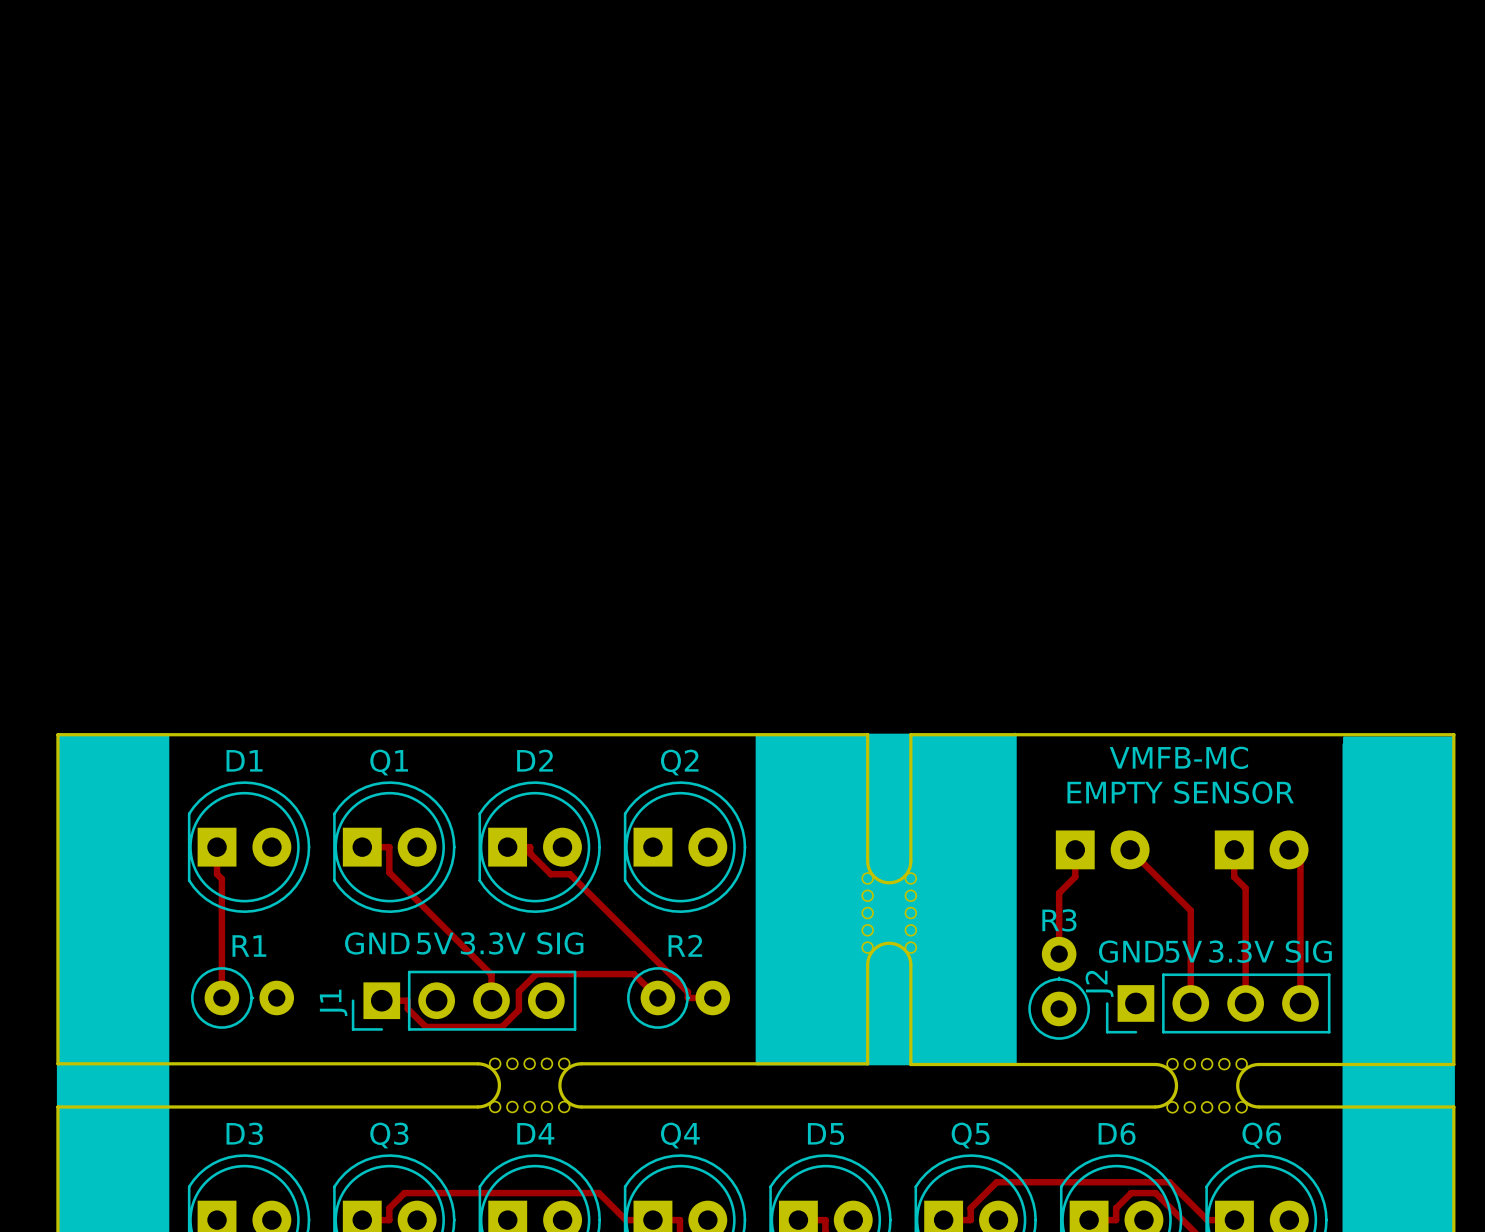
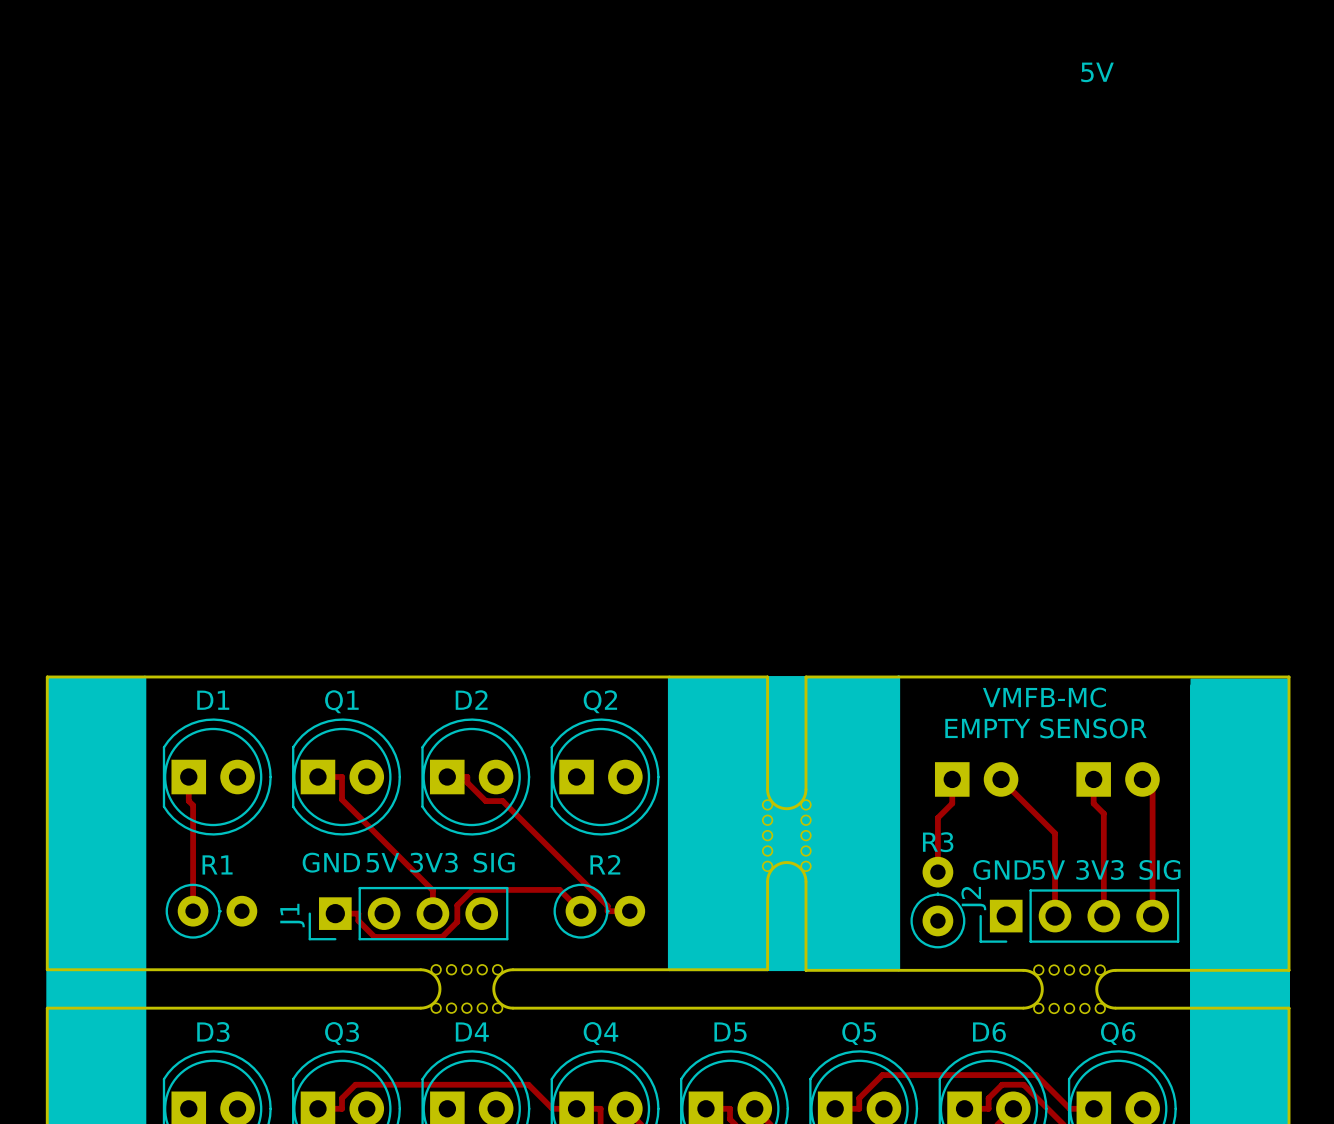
text: none -> 5V (1097, 72)
text: 3.3V (493, 943) -> 3V3 (434, 862)
text: 3.3V (1241, 951) -> 3V3 (1100, 869)

